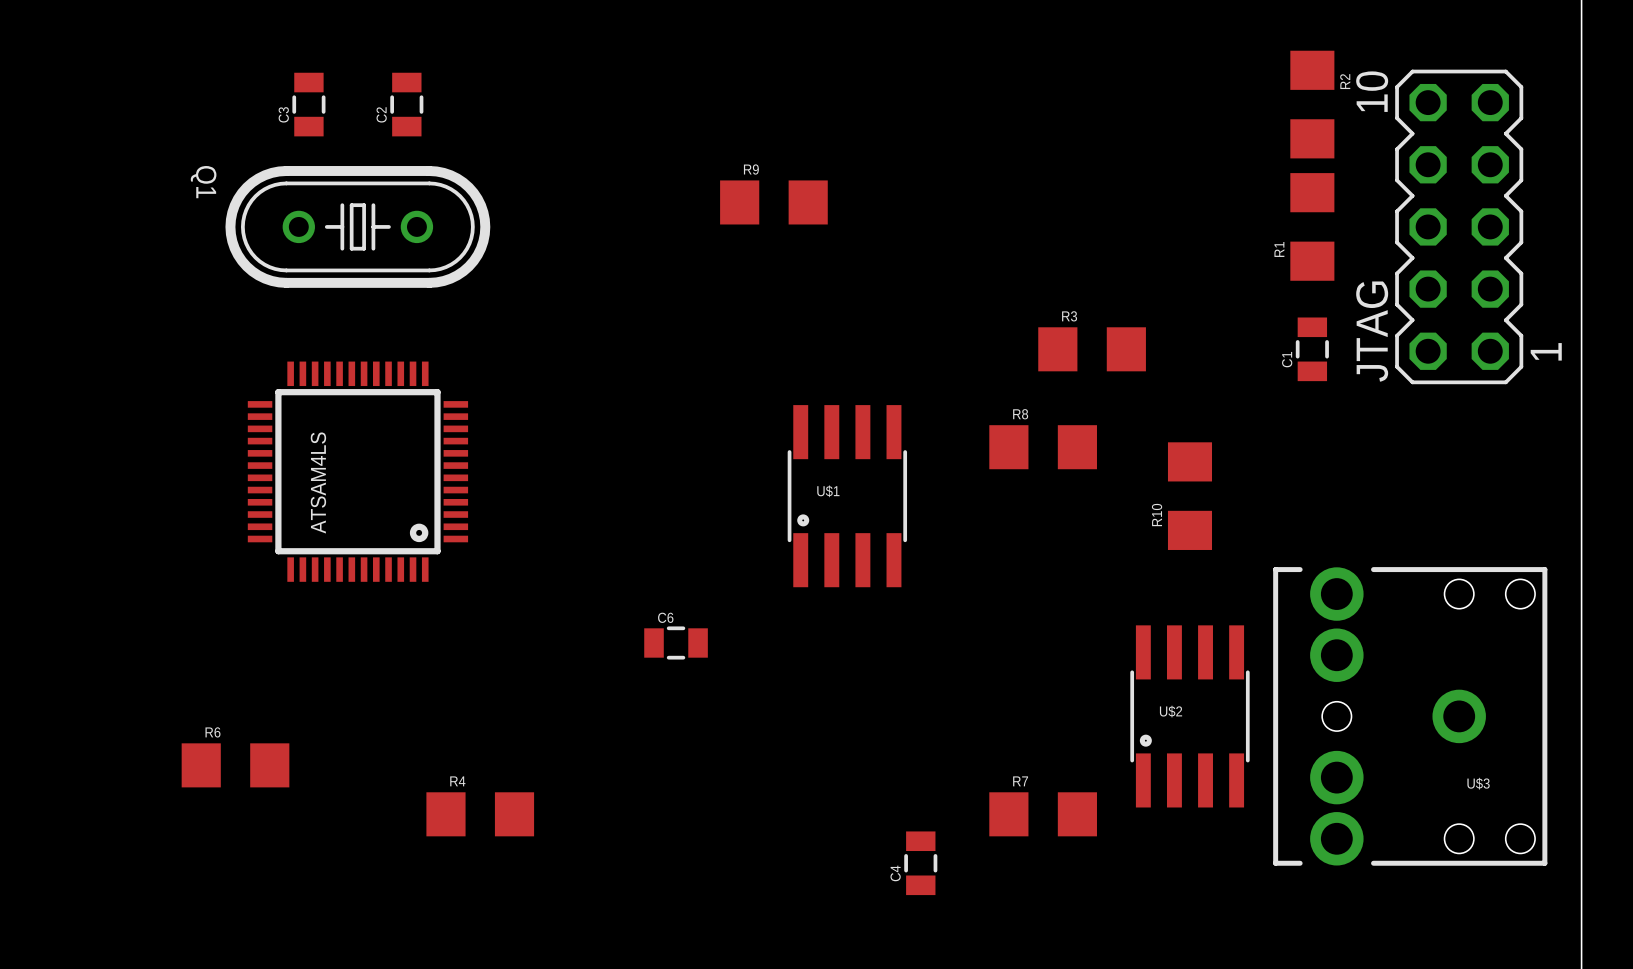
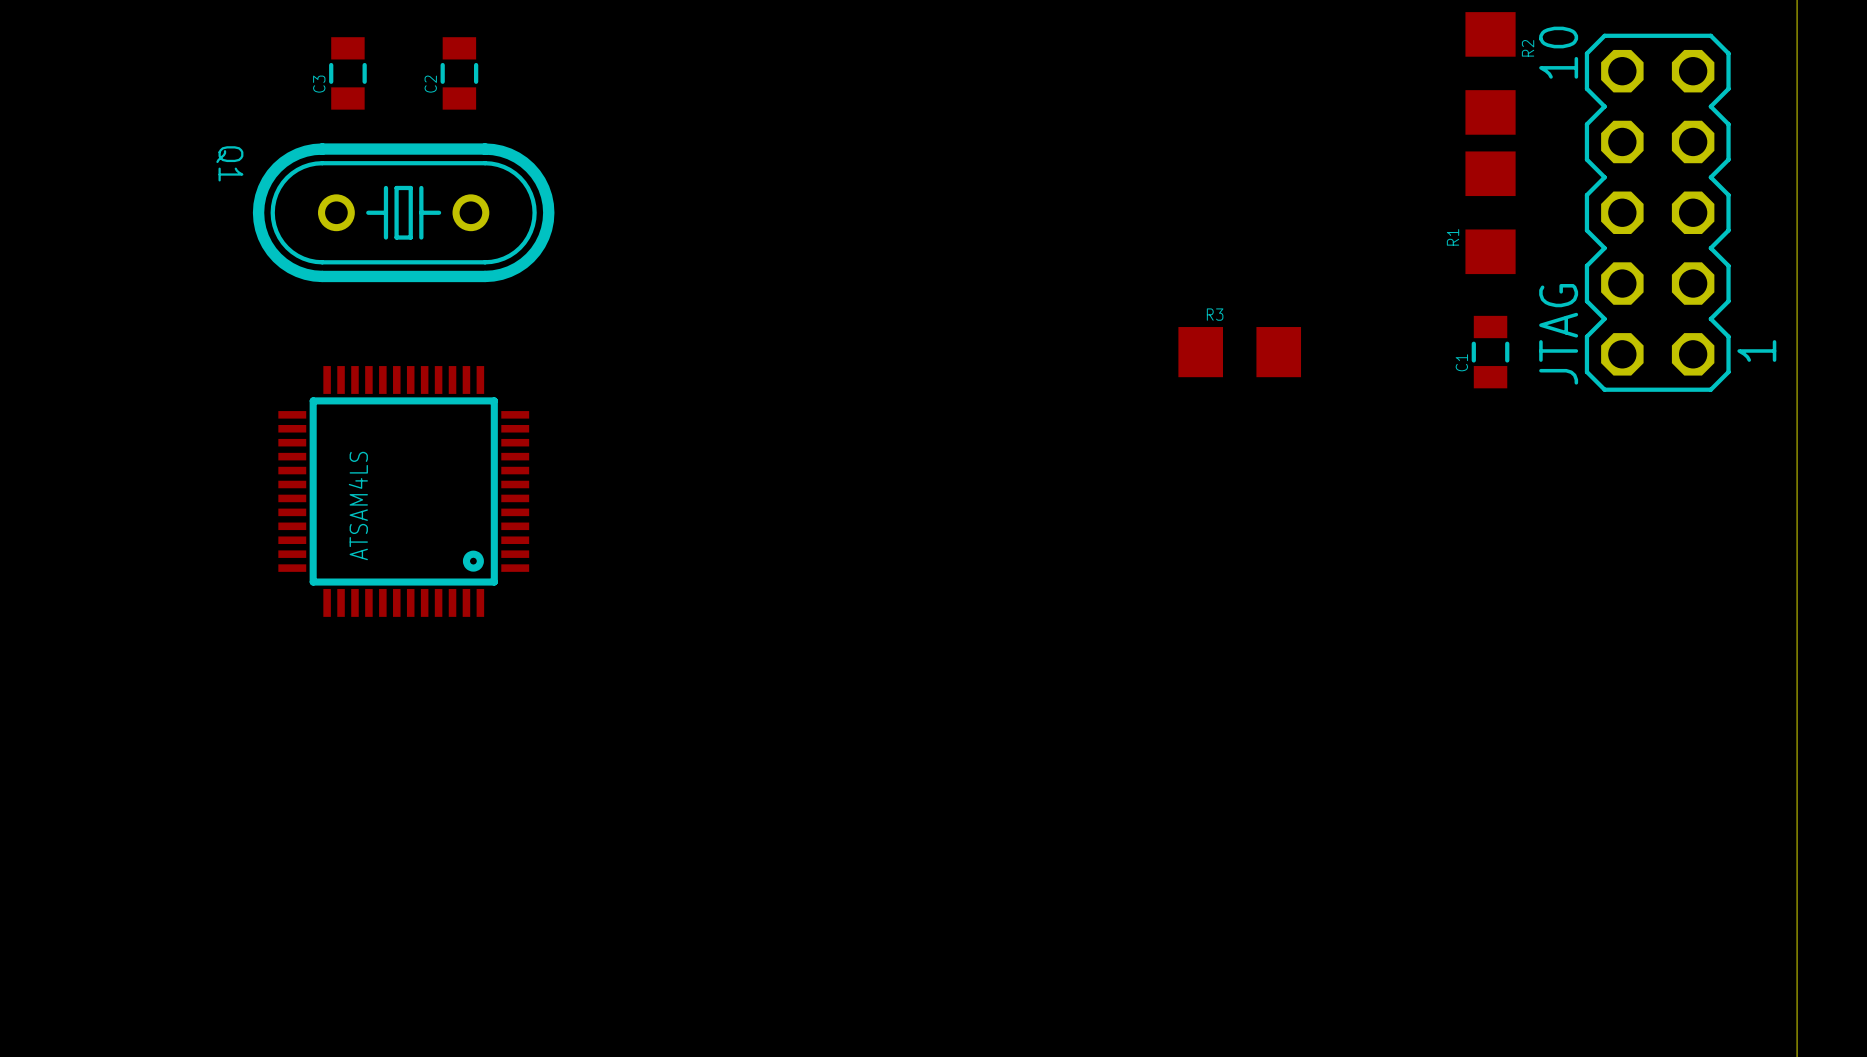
R9: (773, 202) -> none
R8: (1043, 447) -> none
U$1: (847, 496) -> none
R10: (1189, 496) -> none
C6: (676, 642) -> none
U$2: (1189, 716) -> none
U$3: (1410, 716) -> none
R6: (235, 765) -> none
R4: (480, 814) -> none
R7: (1043, 814) -> none
C4: (920, 863) -> none

